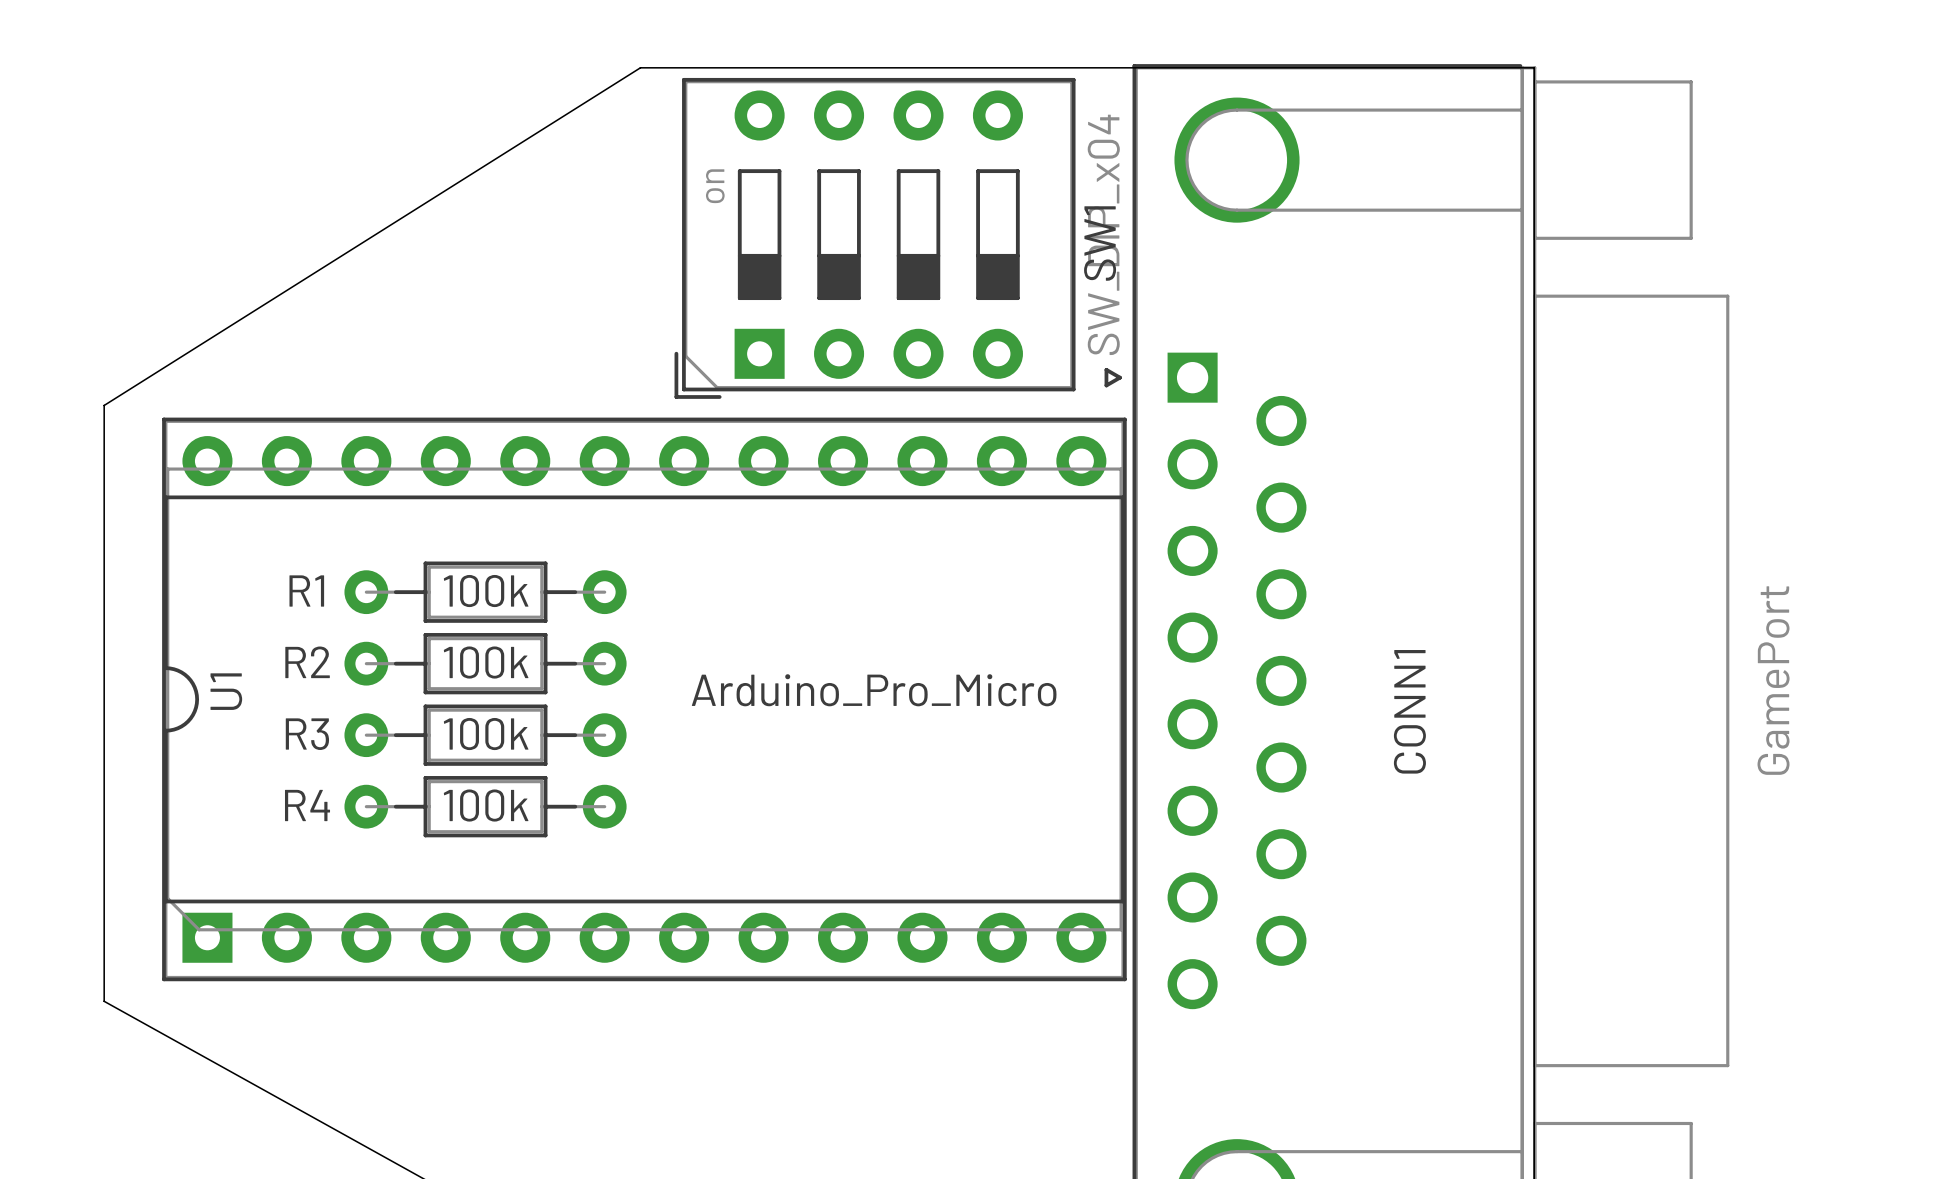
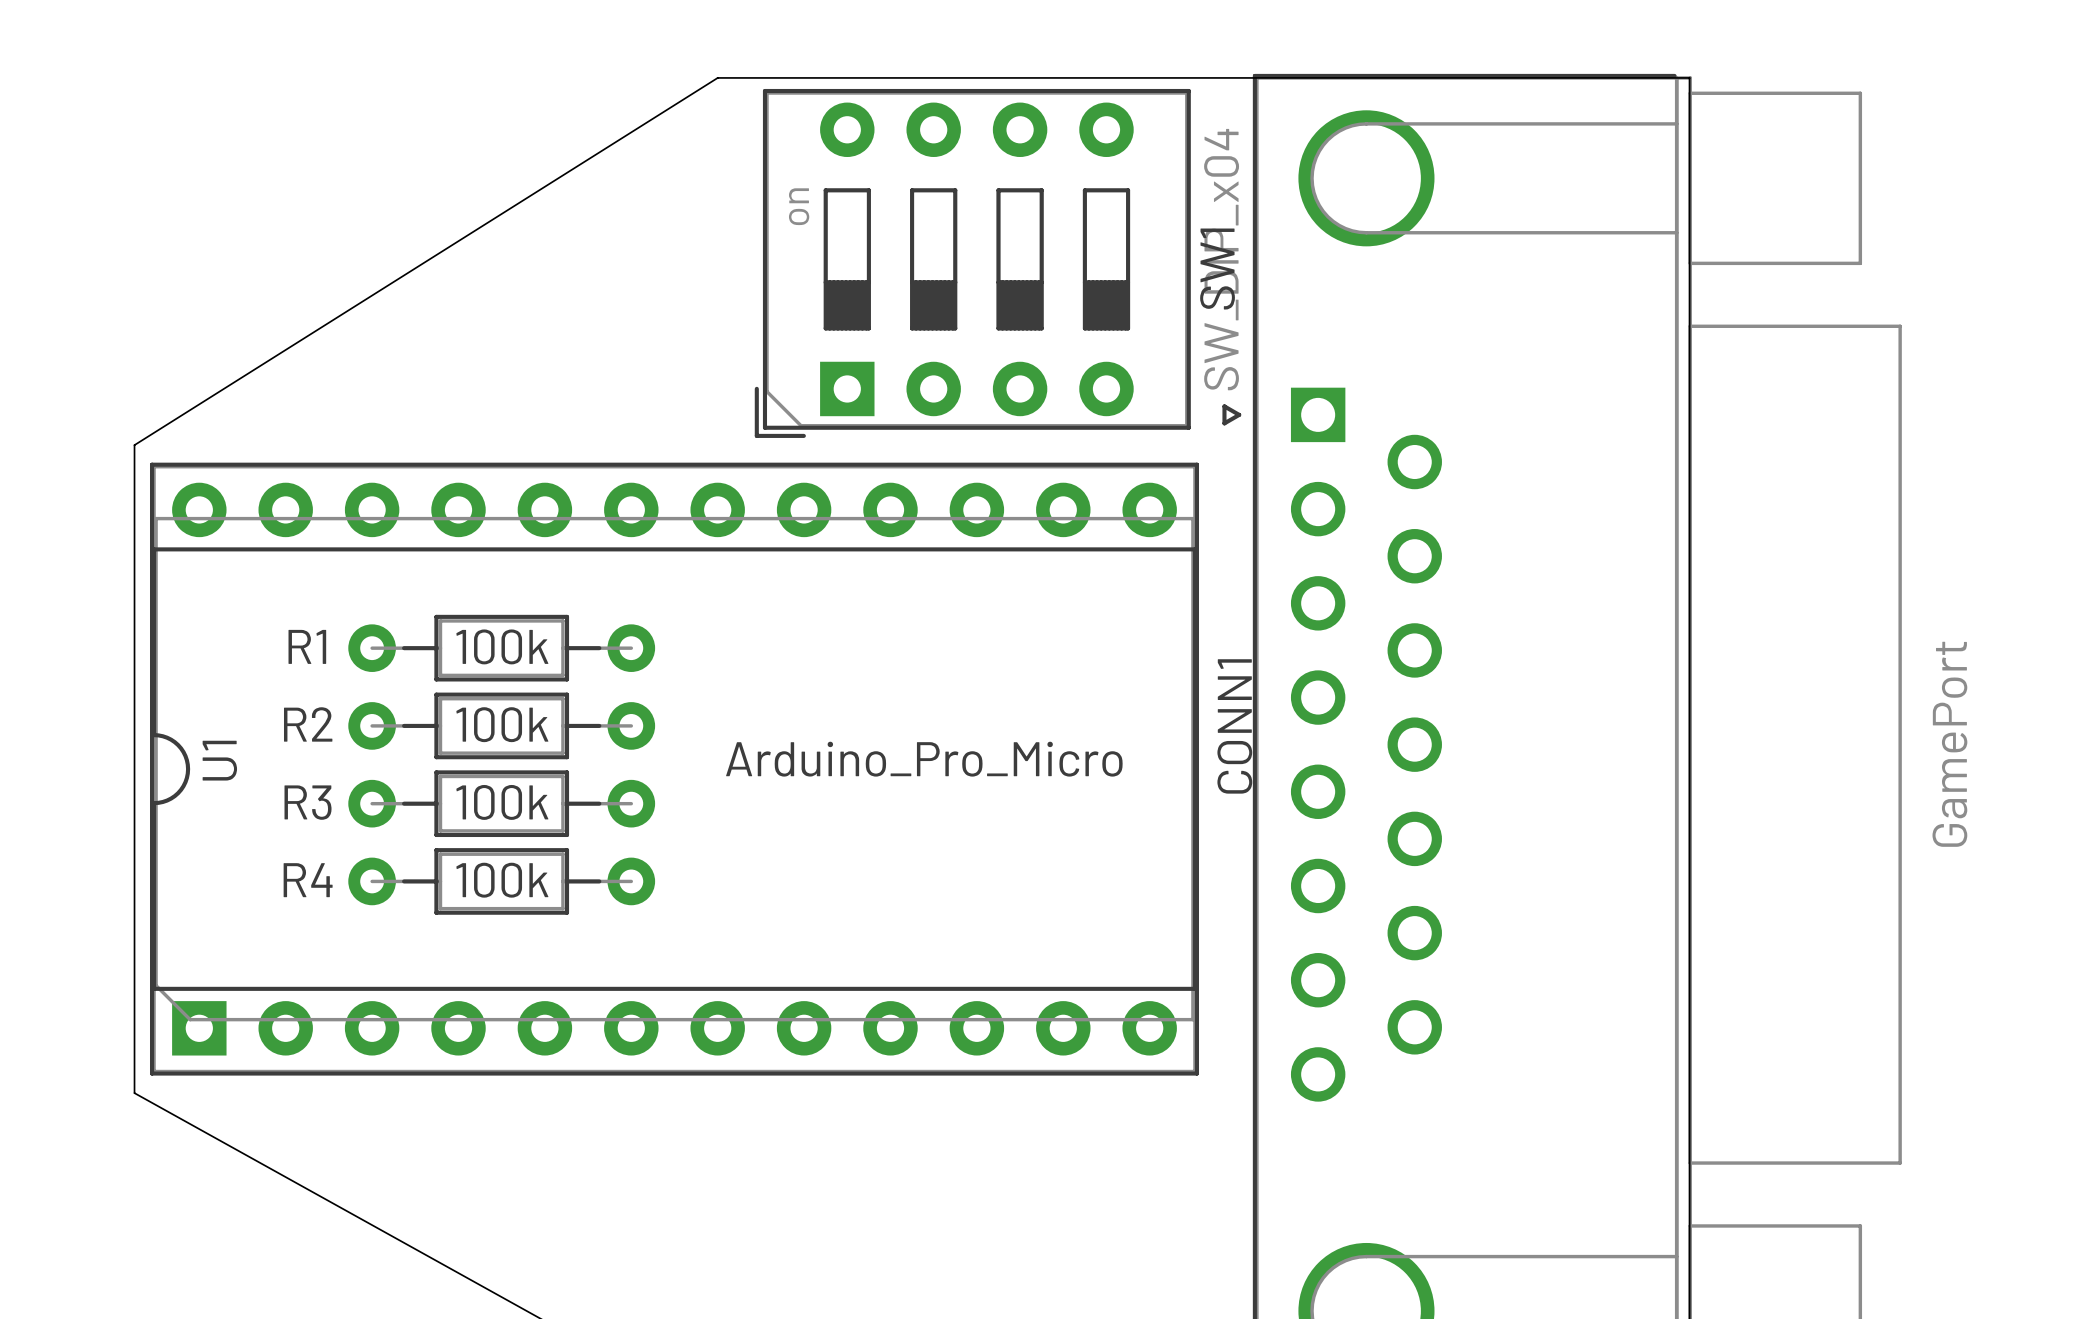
R1 position: (485, 592) -> (501, 648)
R2 position: (485, 663) -> (501, 725)
U1 position: (644, 699) -> (674, 769)
CONN1 name position: CONN1 (1409, 711) -> CONN1 (1234, 726)
R3 position: (485, 735) -> (501, 803)
R4 position: (485, 806) -> (501, 881)

